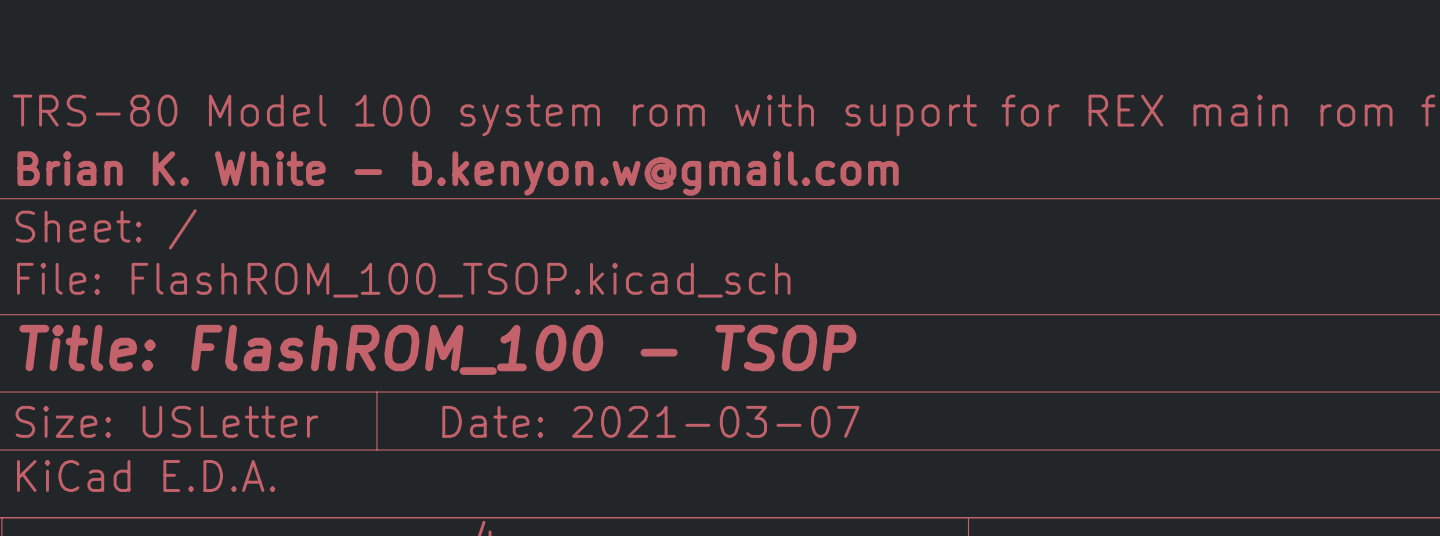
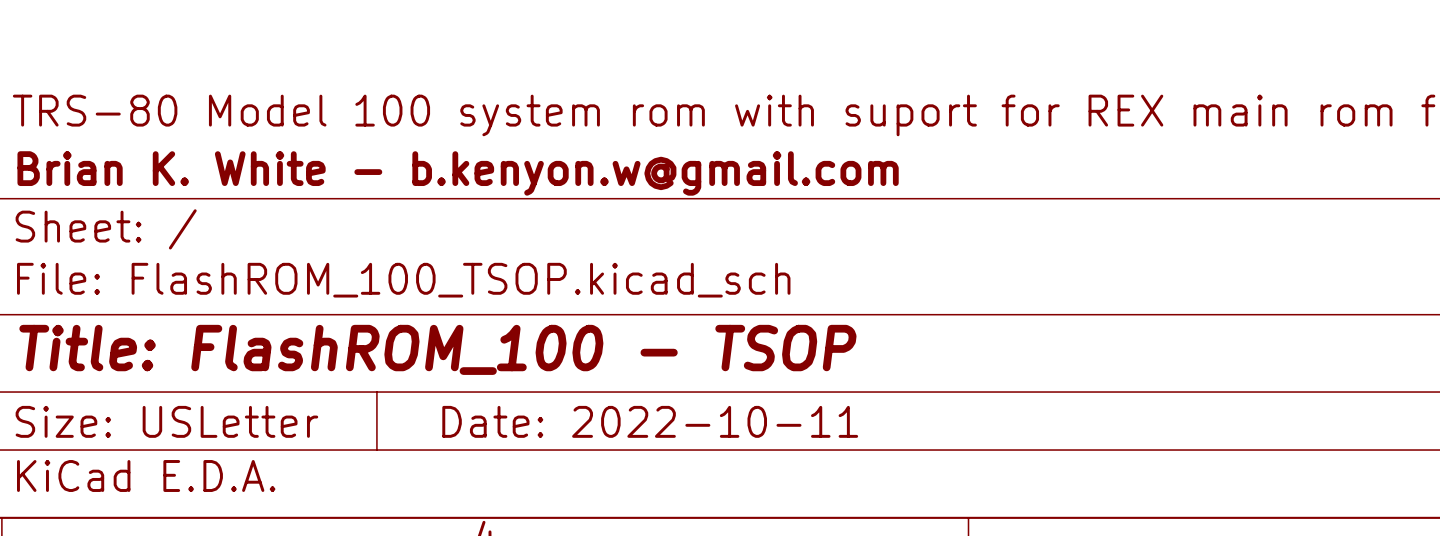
title block: Date: 2021-03-07 (650, 421) -> Date: 2022-10-11 (650, 421)

